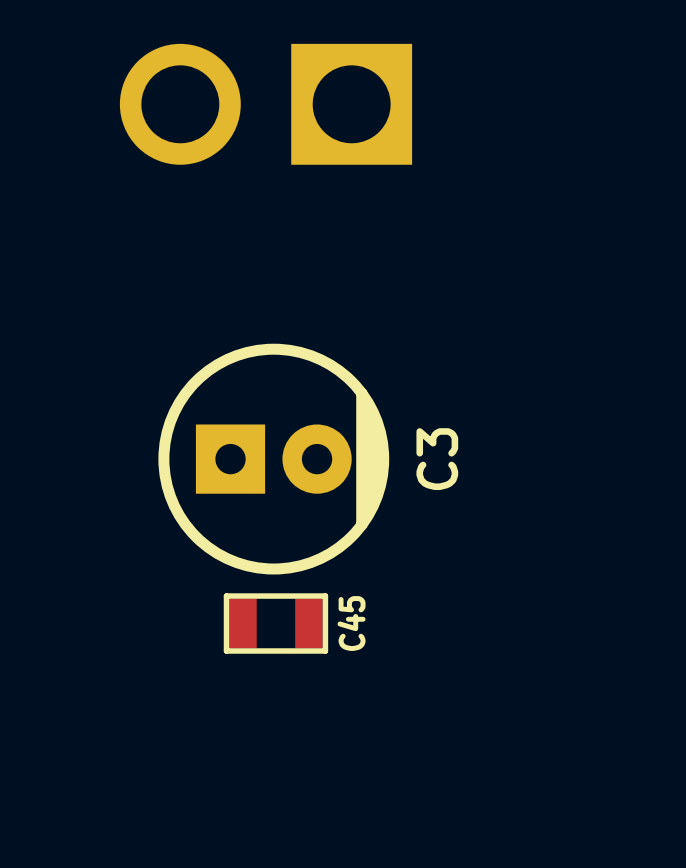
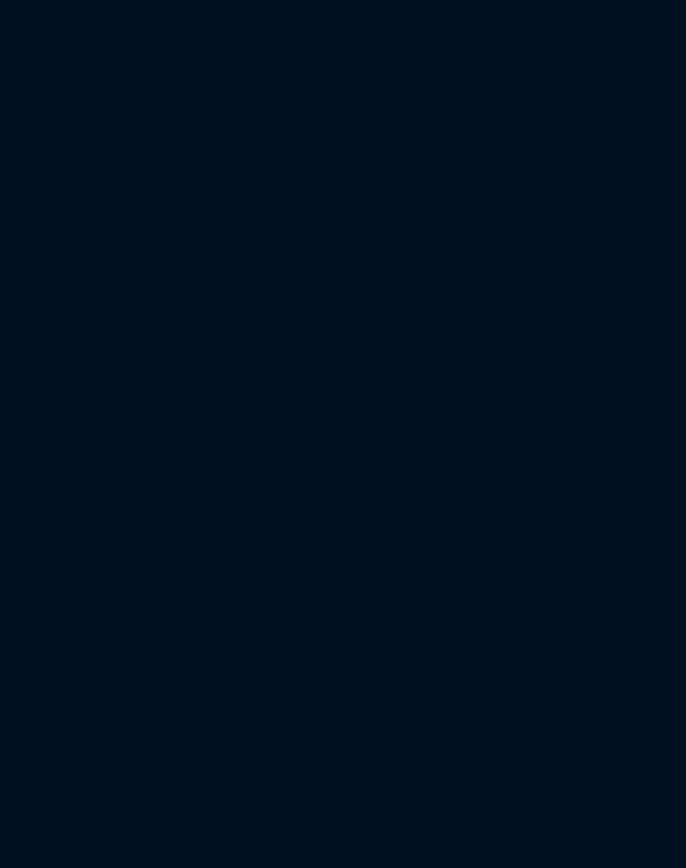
part: (266, 104) -> none
C3: (273, 459) -> none
C45: (275, 623) -> none

